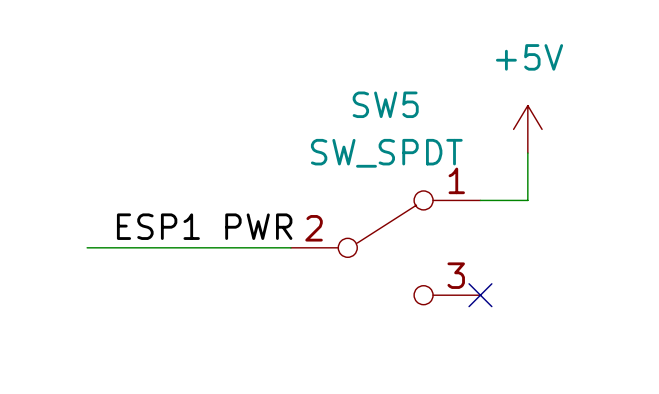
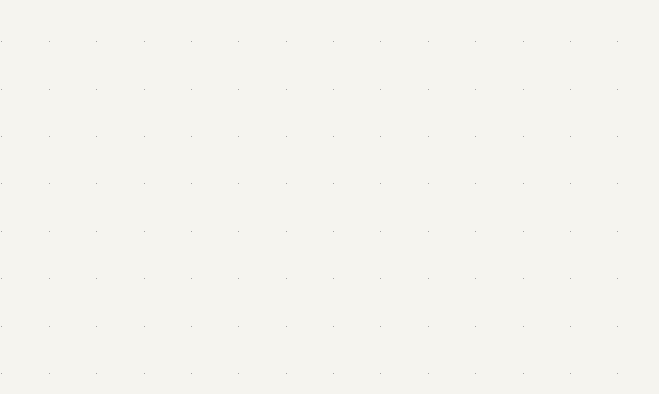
power symbol: +5V (527, 129) -> none
wire: (527, 153) (527, 200) (480, 200) -> none
label: ESP1 PWR (204, 226) -> none
wire: (87, 247) (290, 247) -> none
SW5: SW_SPDT (385, 247) -> none
no-connect mark: (480, 295) -> none

